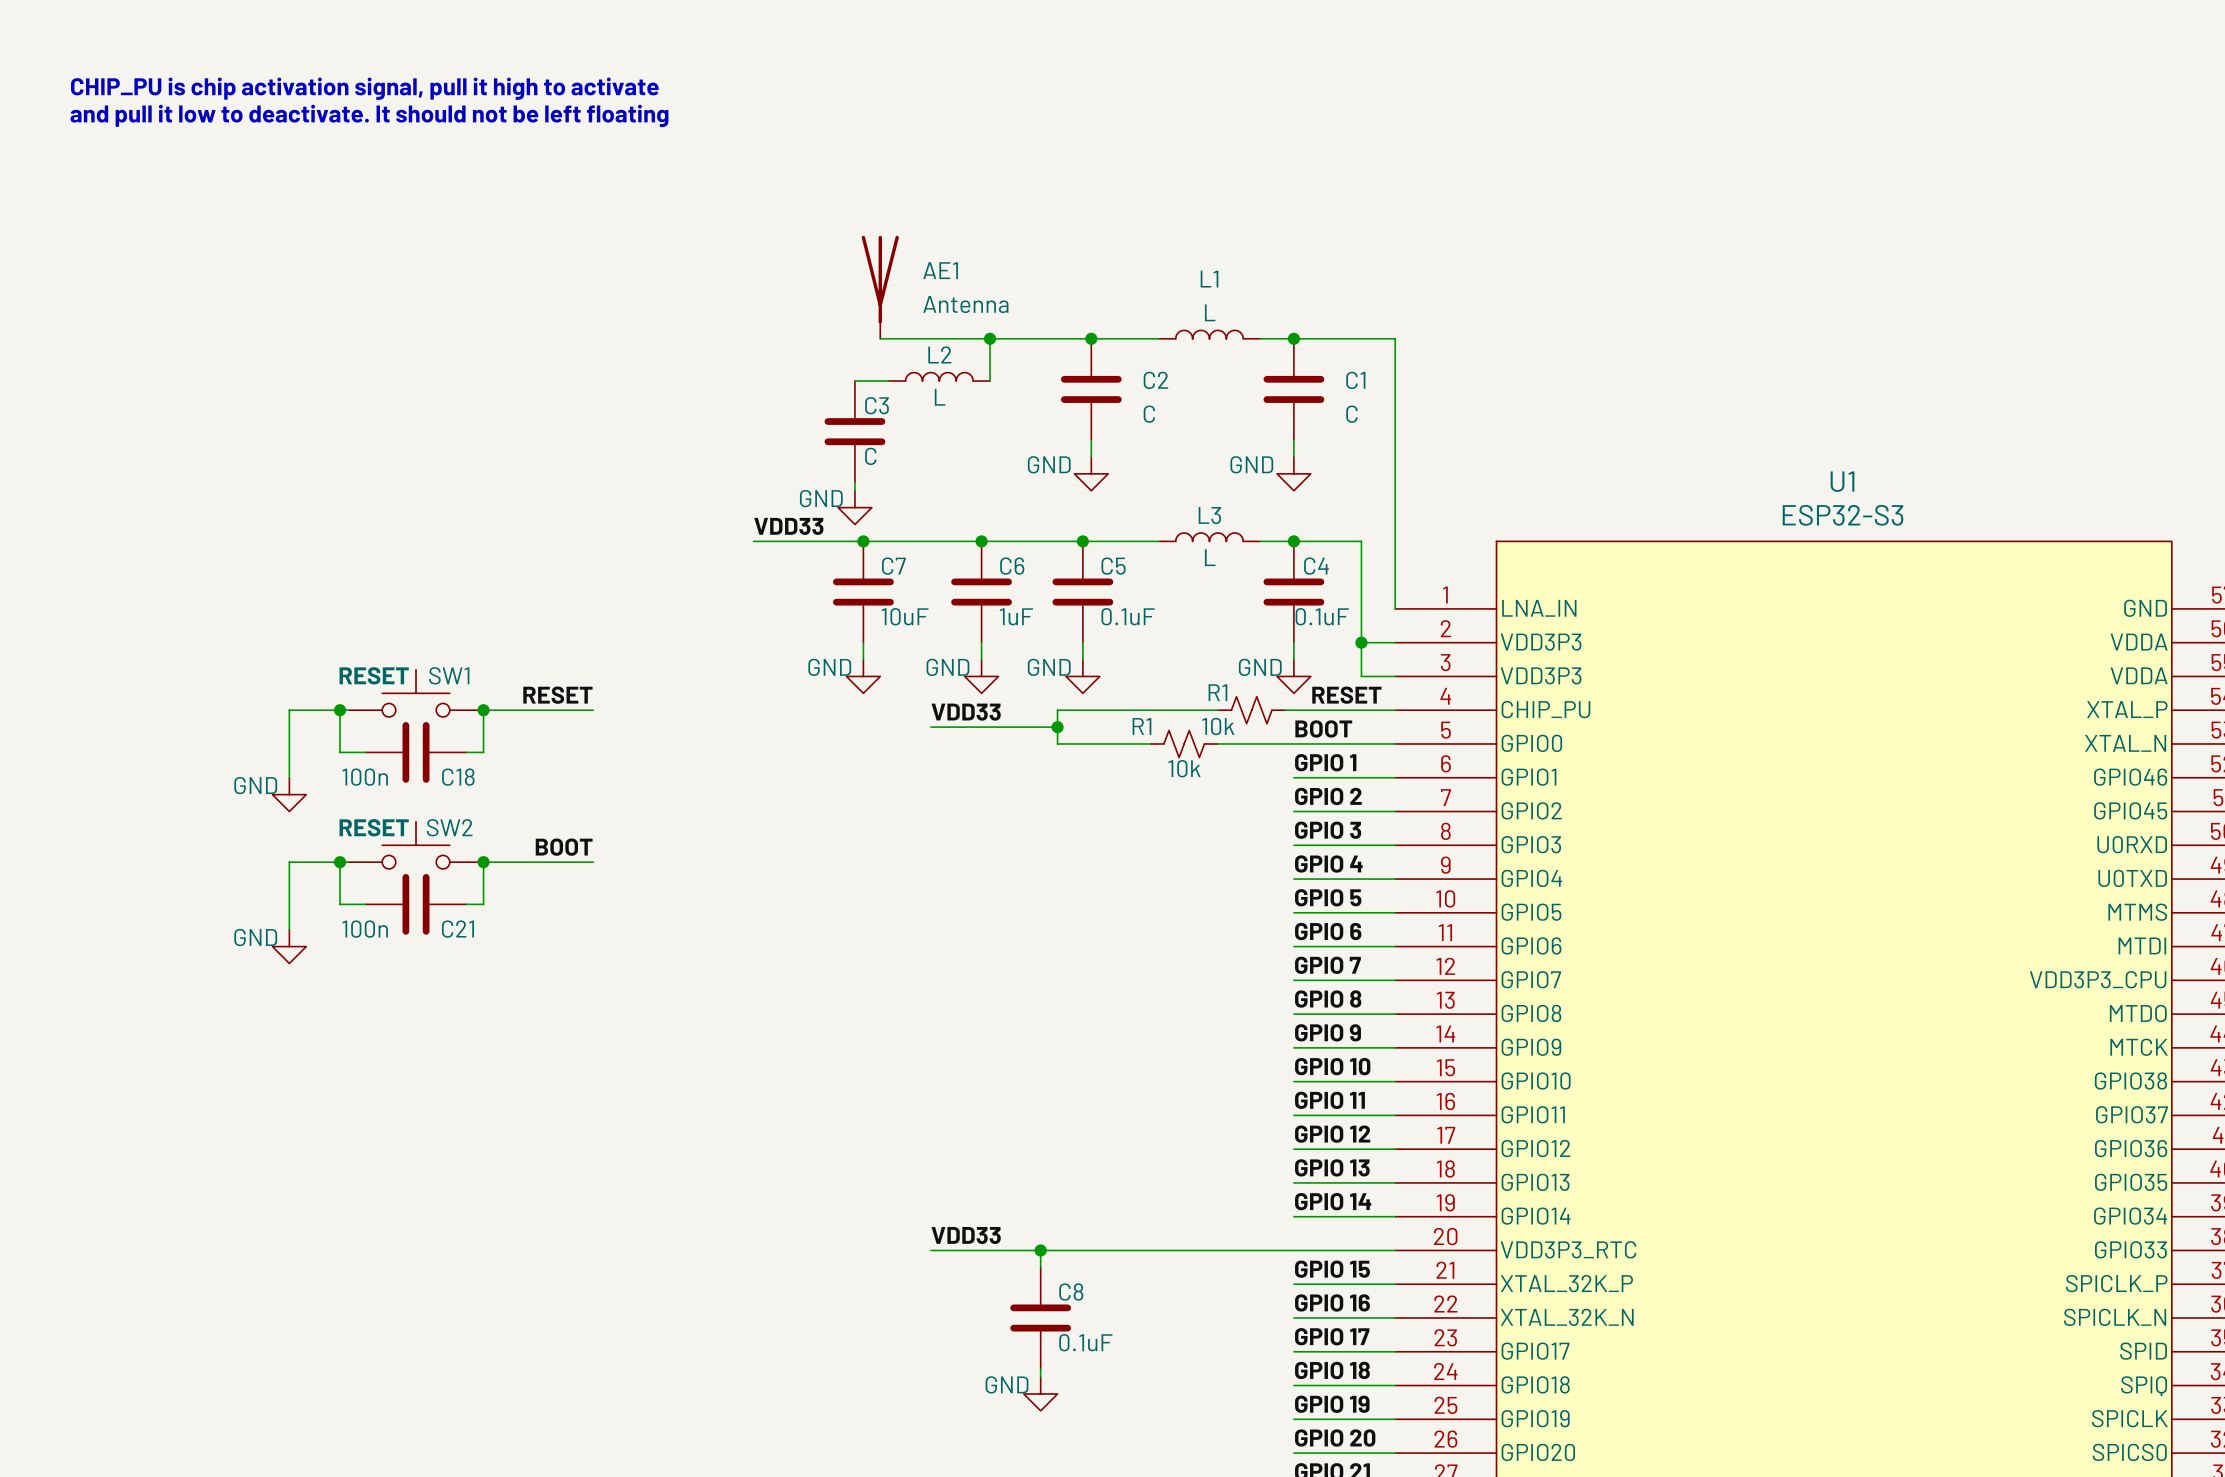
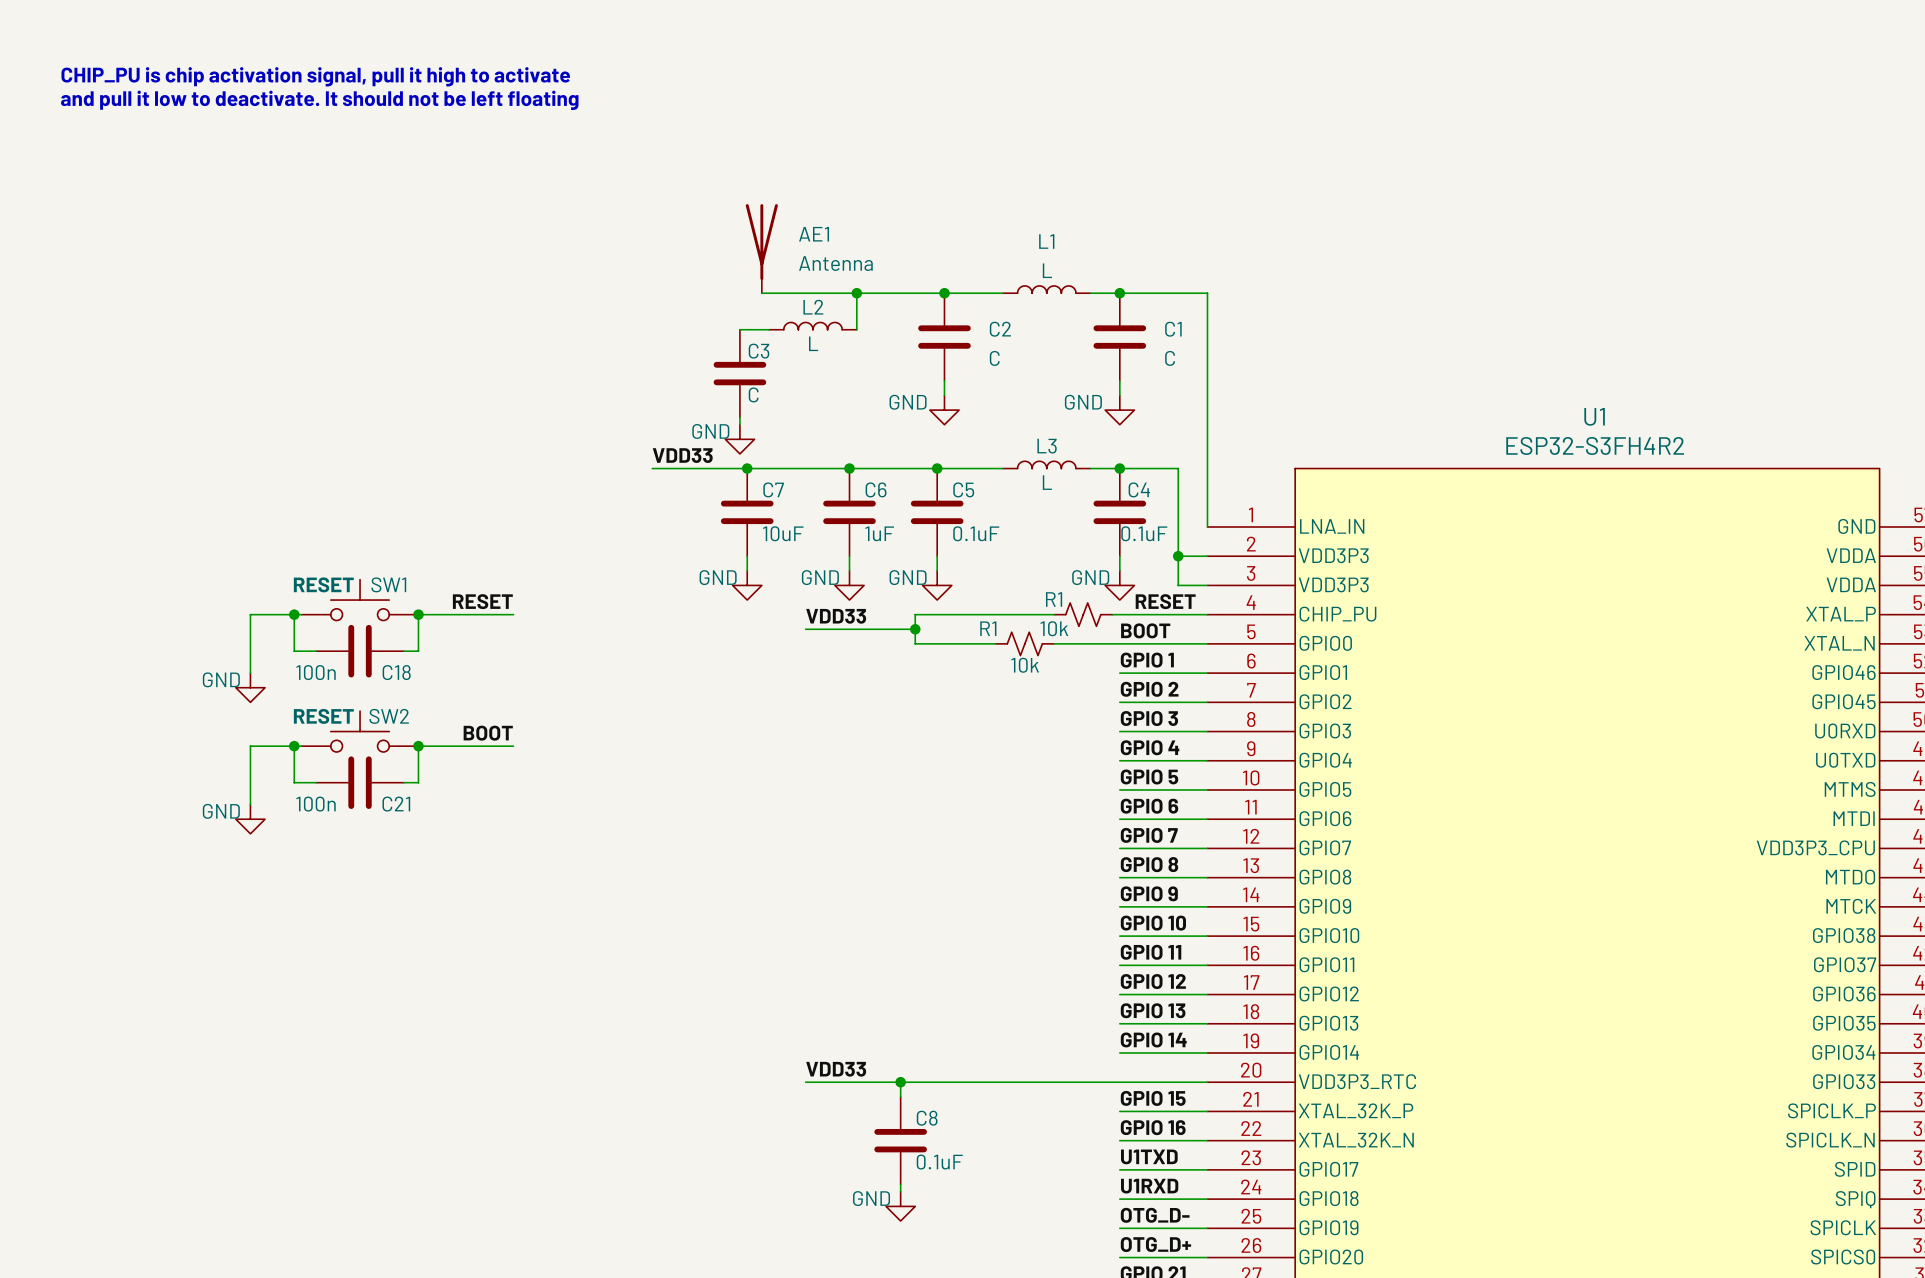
U1 value: ESP32-S3 (1843, 515) -> ESP32-S3FH4R2 (1595, 445)
label: GPIO 17 (1332, 1336) -> U1TXD (1149, 1156)
label: GPIO 18 (1332, 1370) -> U1RXD (1149, 1186)
label: GPIO 19 (1332, 1404) -> OTG_D- (1155, 1215)
label: GPIO 20 (1335, 1438) -> OTG_D+ (1155, 1244)

